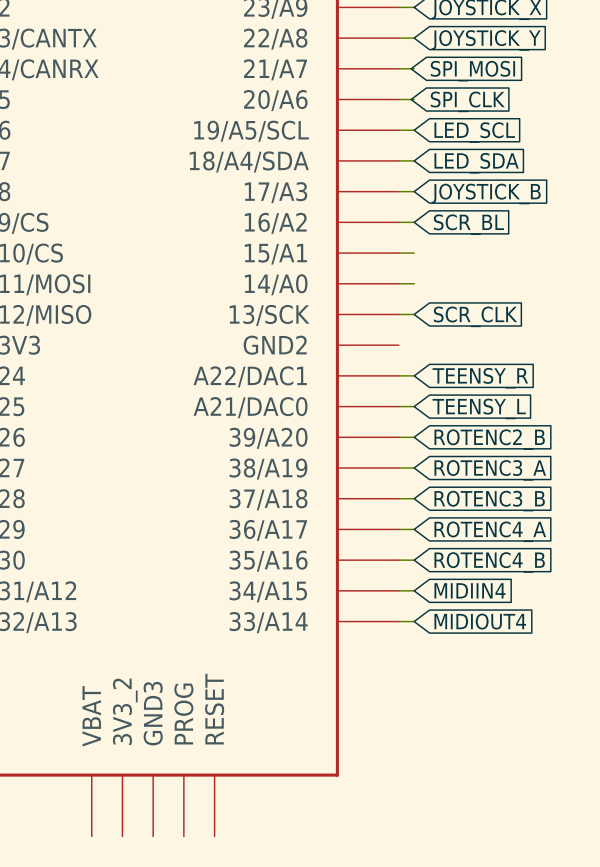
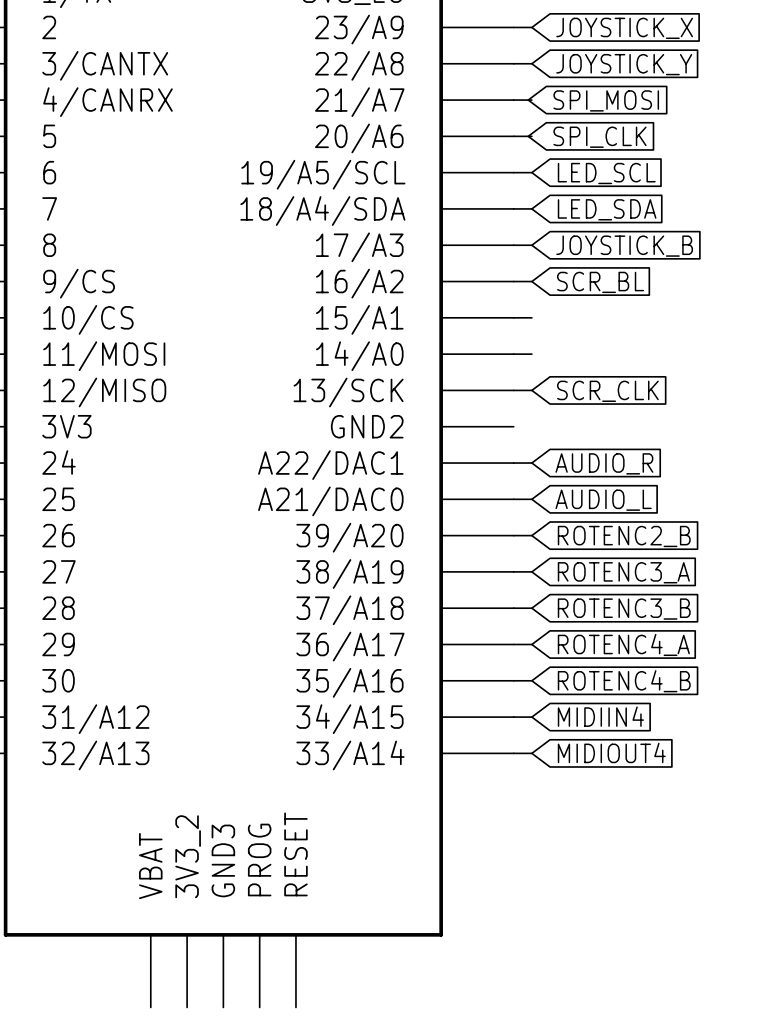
global label: TEENSY_R (480, 378) -> AUDIO_R (604, 463)
global label: TEENSY_L (479, 408) -> AUDIO_L (603, 500)

